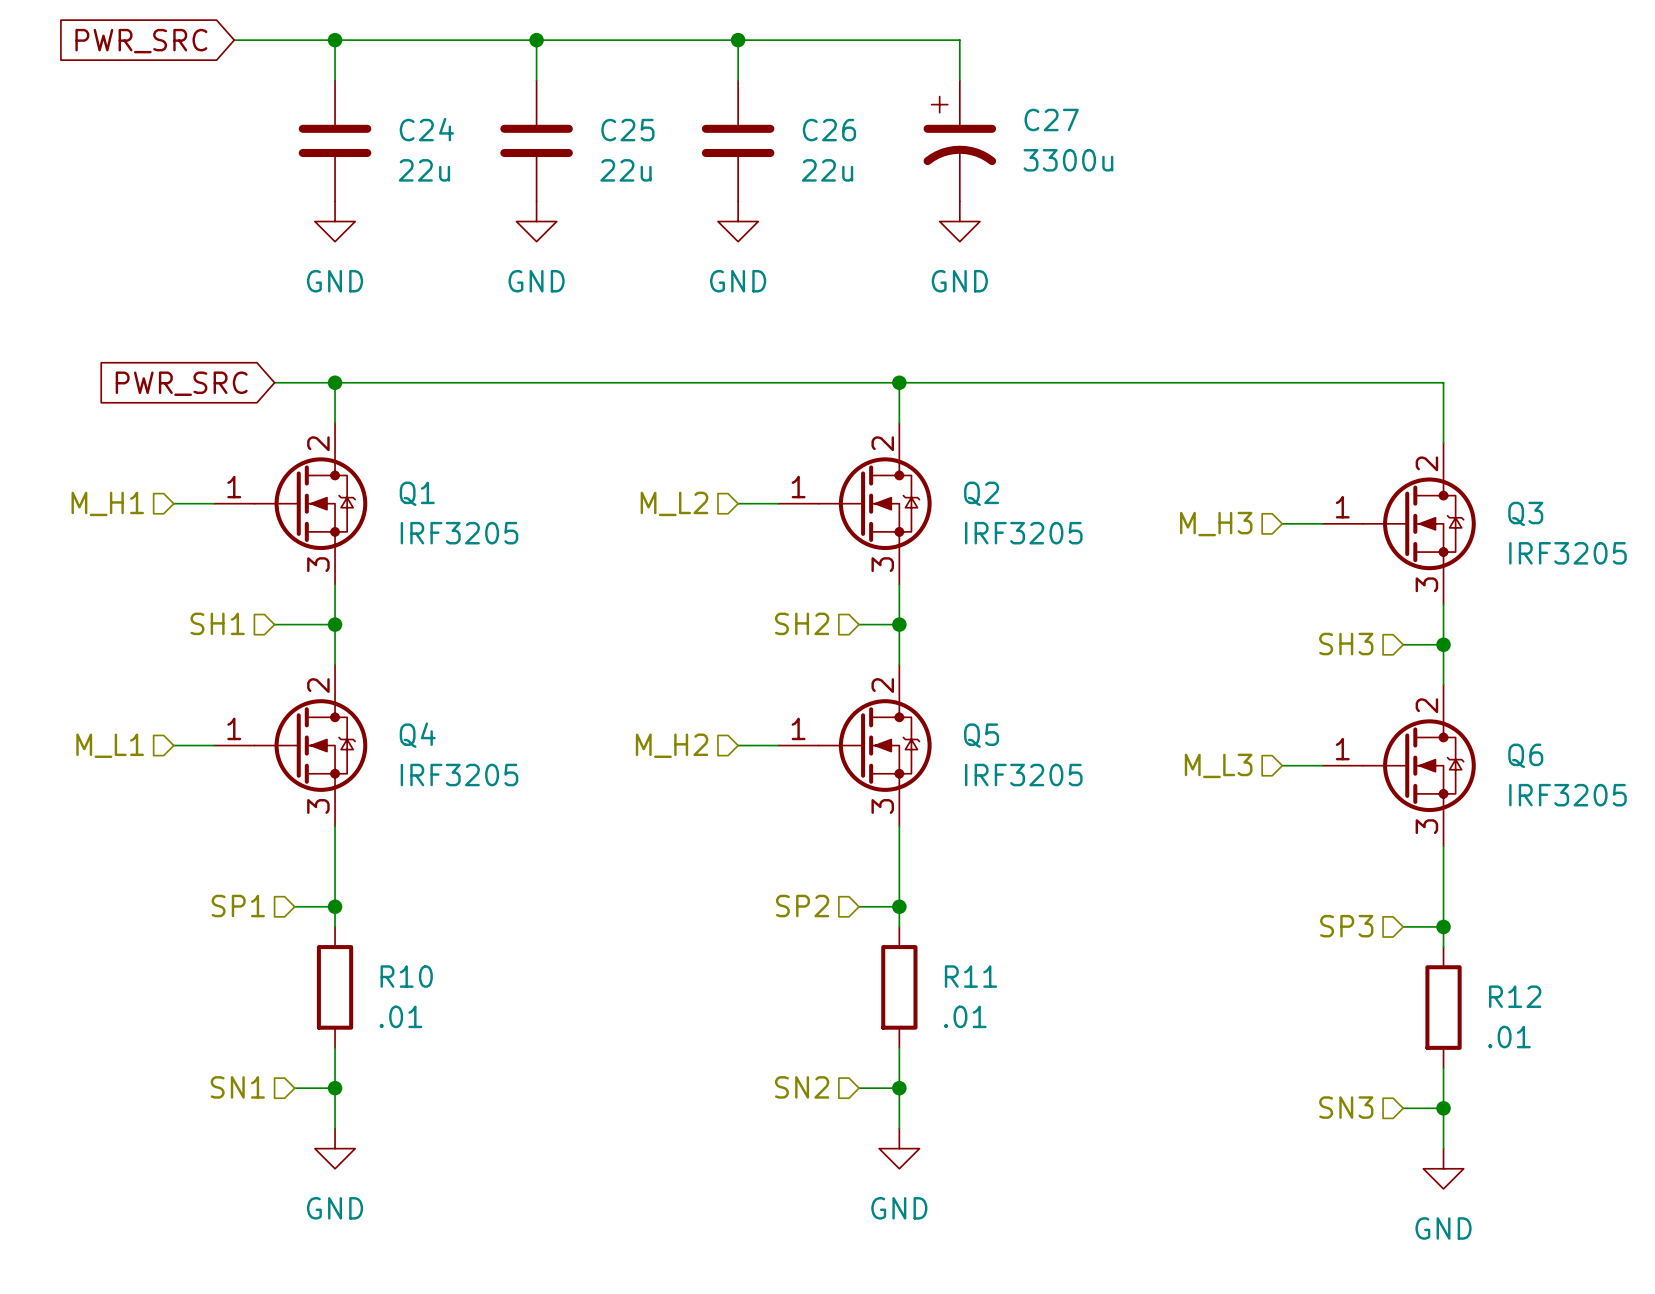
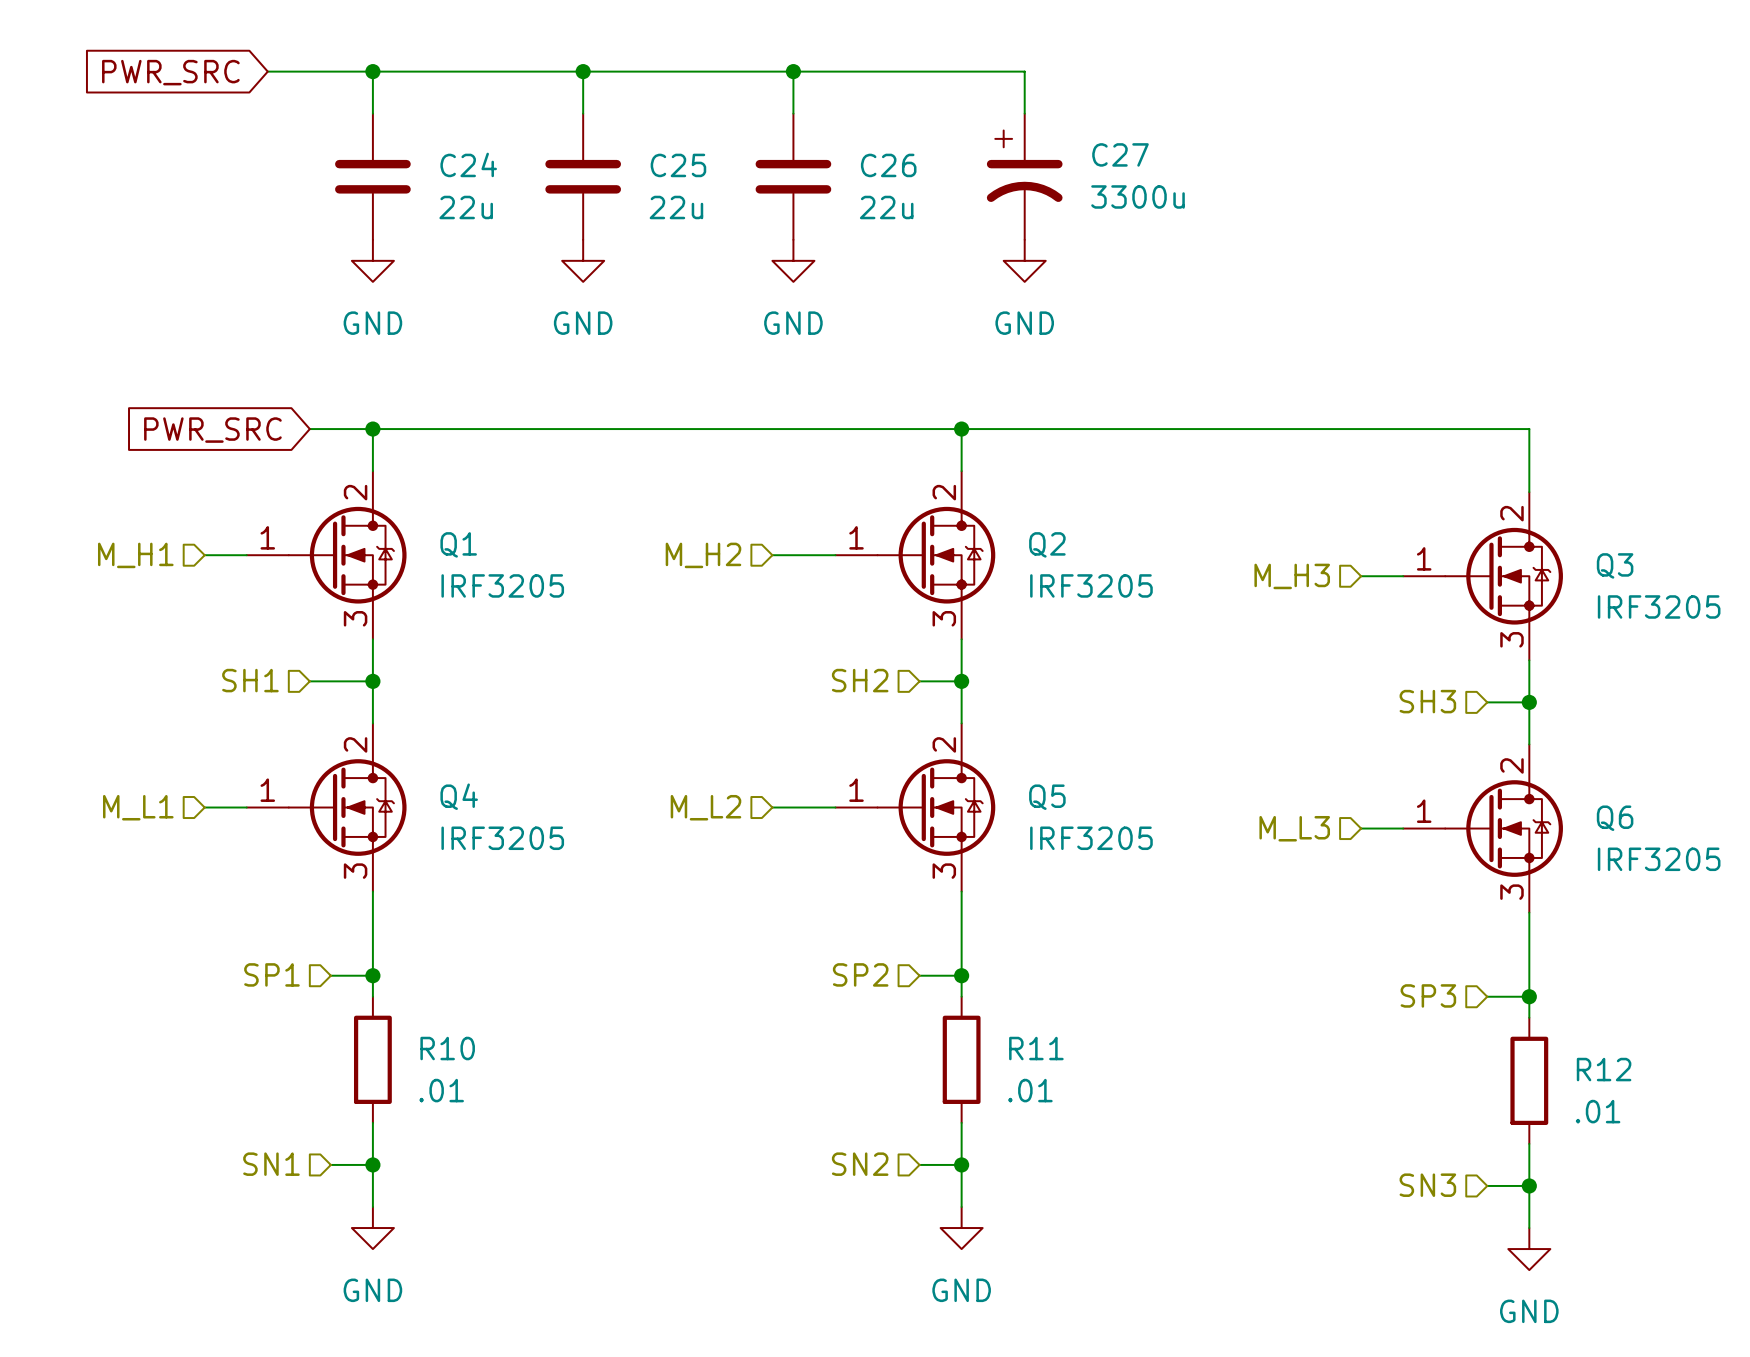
hierarchical label position: M_L2 (674, 503) -> M_L2 (705, 807)
wire: none -> (772, 555) (793, 555)
hierarchical label position: M_H2 (672, 745) -> M_H2 (703, 555)
wire: none -> (772, 807) (793, 807)

